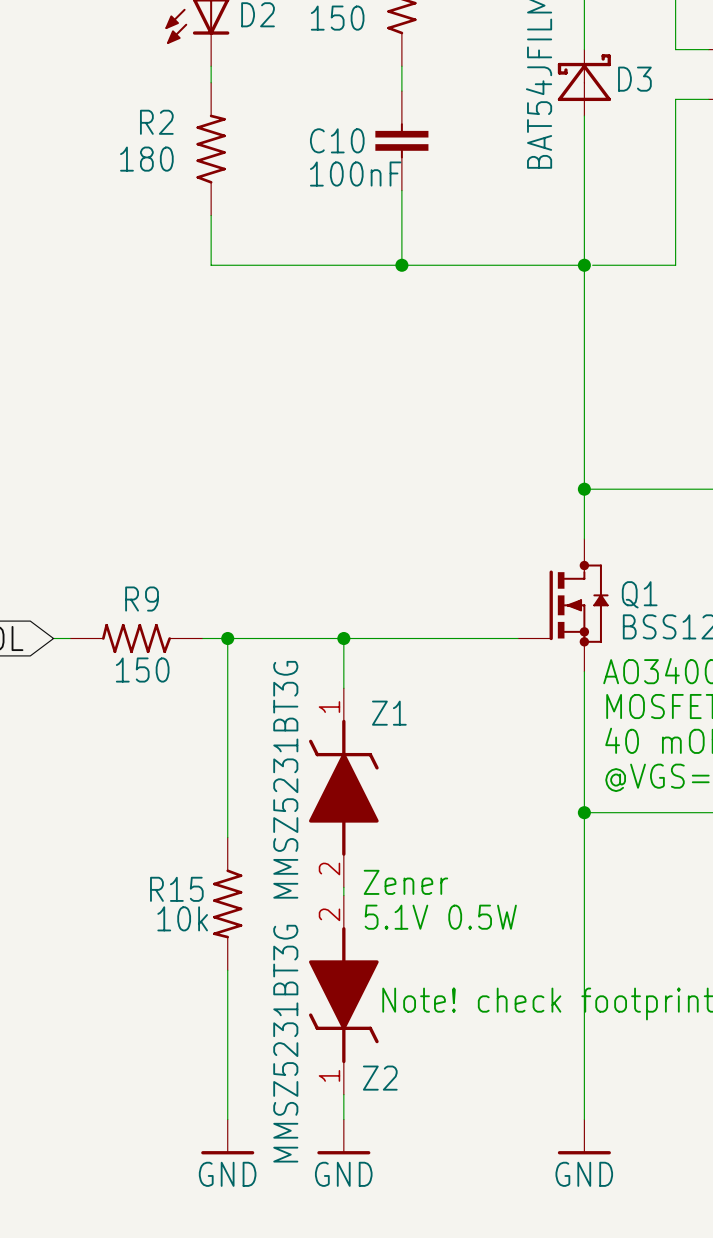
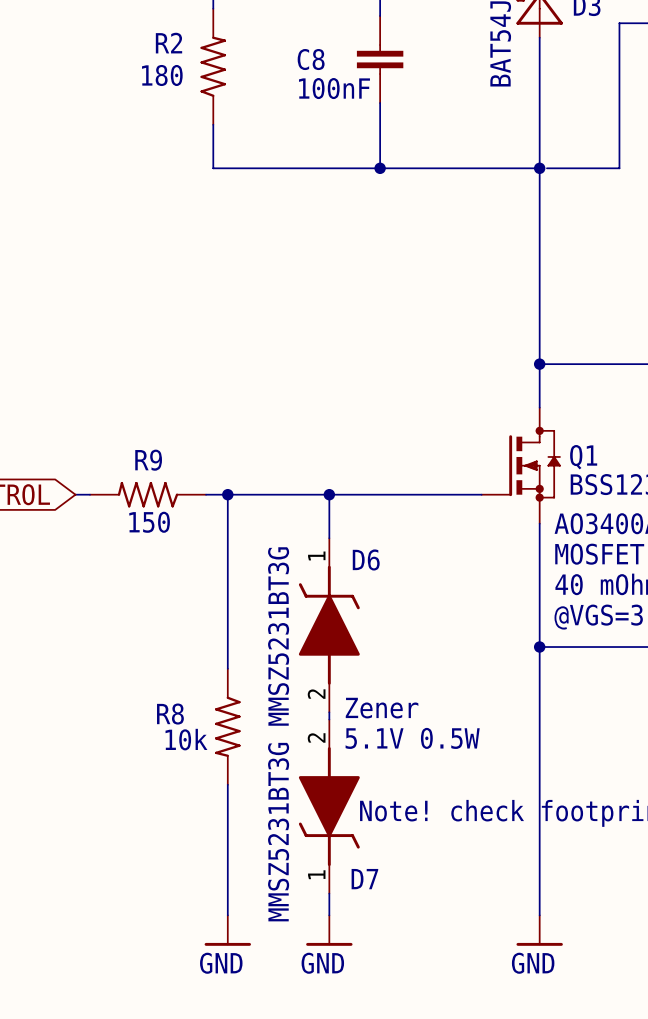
C10 name: C10 (337, 140) -> C8 (311, 59)
Z1 name: Z1 (389, 713) -> D6 (366, 559)
R15 name: R15 (176, 889) -> R8 (170, 714)
Z2 name: Z2 (380, 1078) -> D7 (364, 879)

